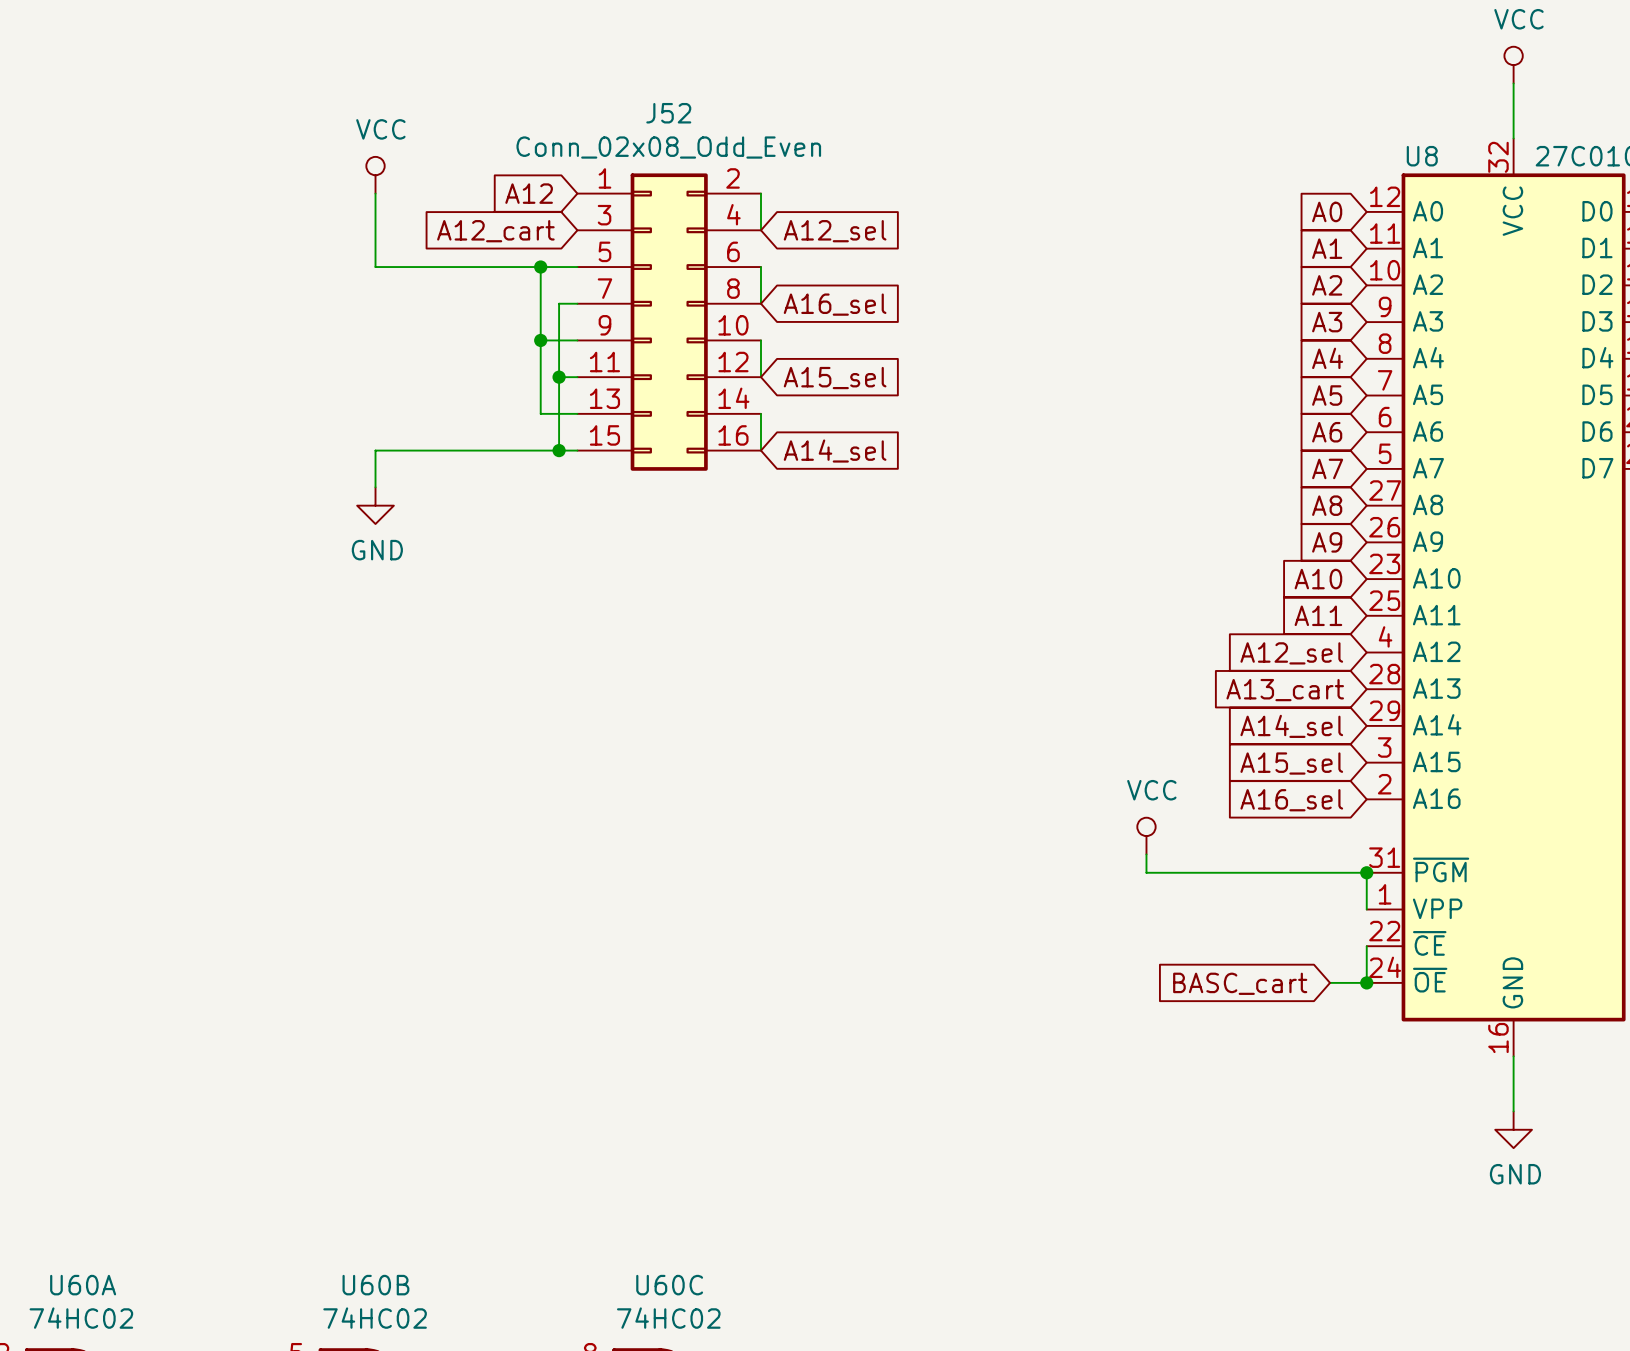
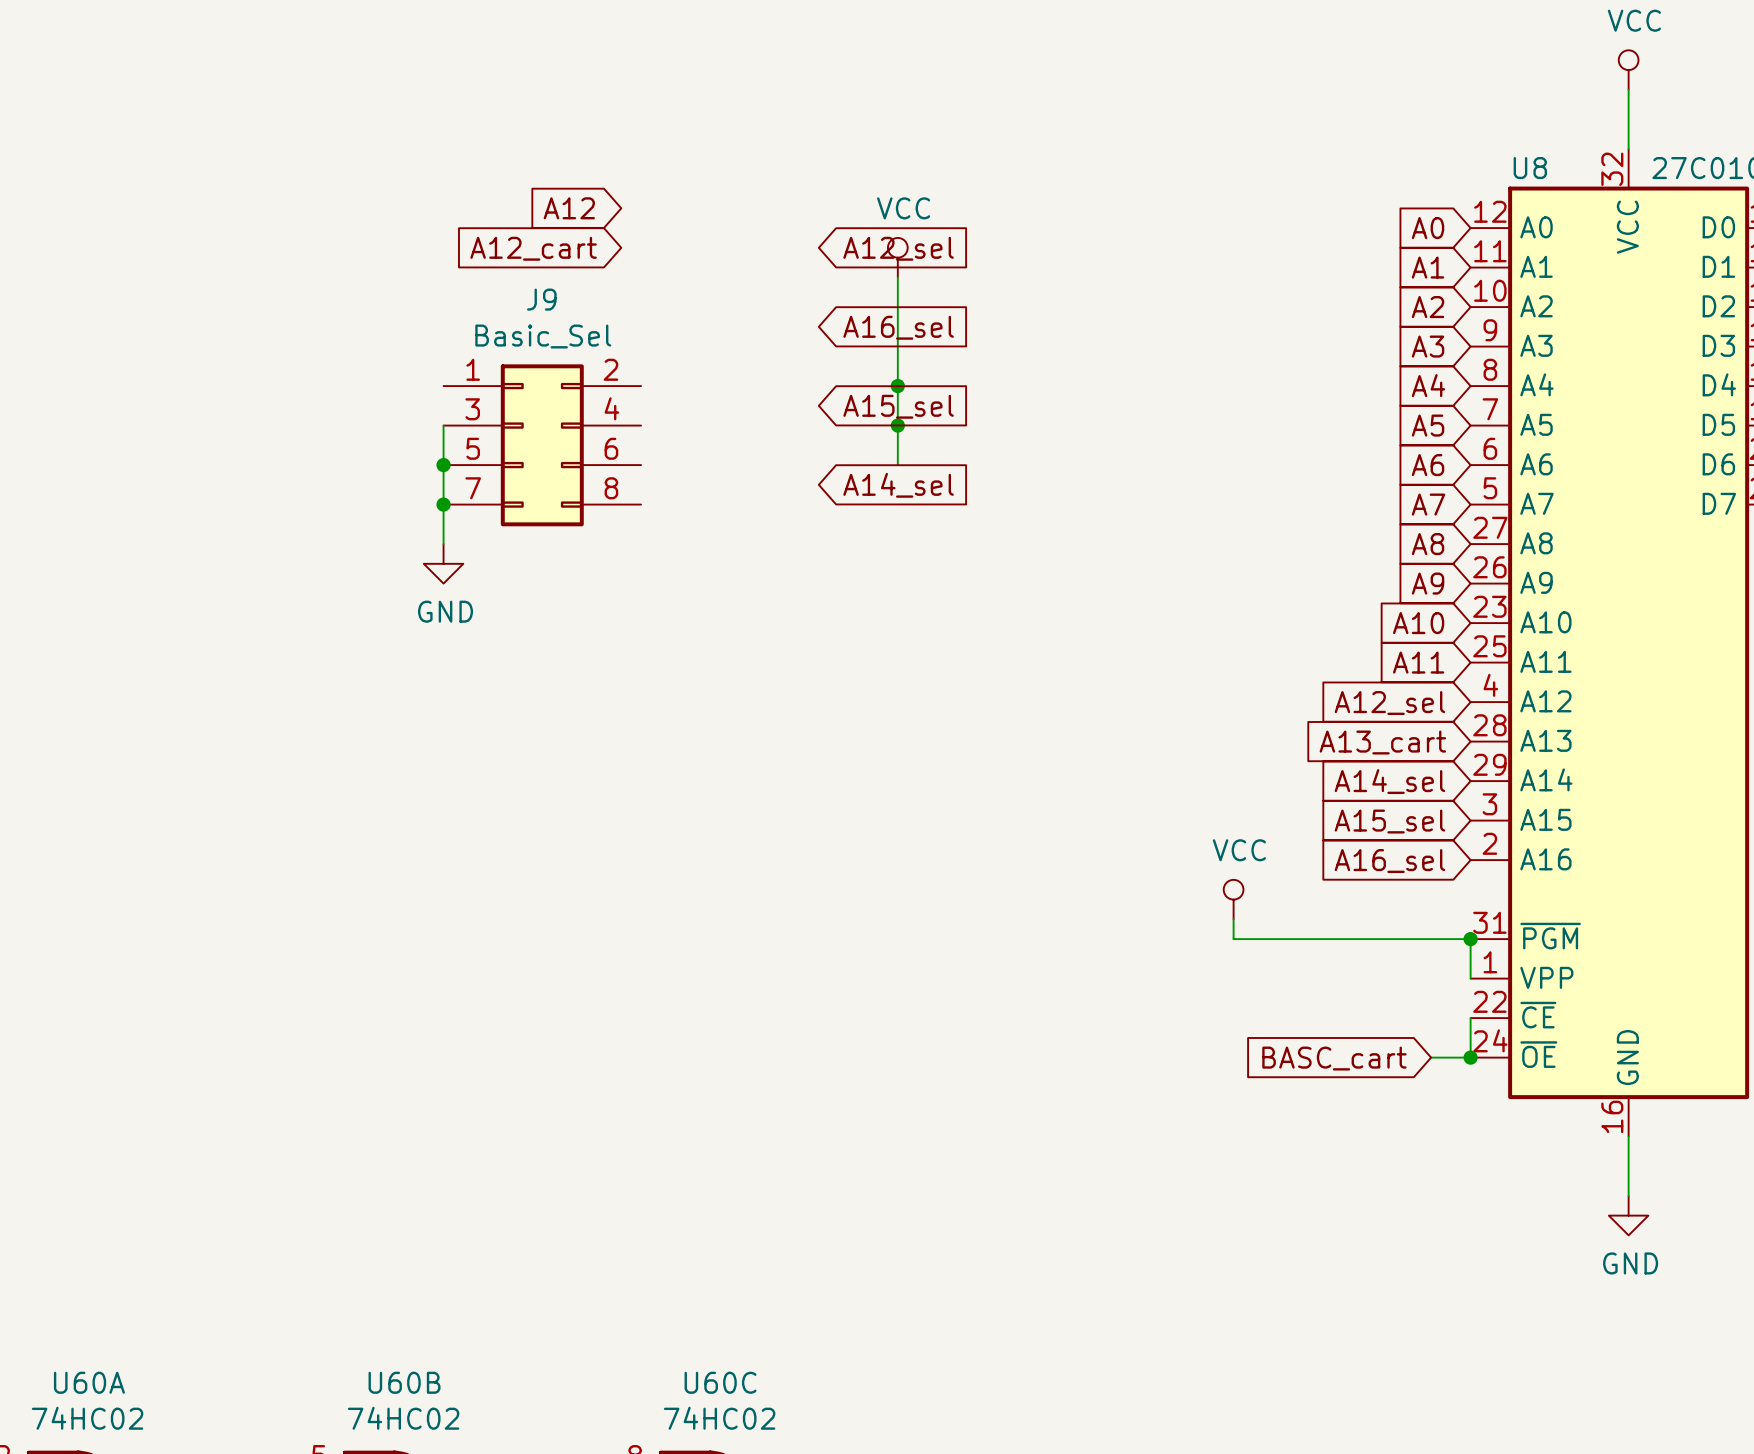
power symbol: VCC (375, 175) -> none
wire: (375, 193) (375, 267) (577, 267) -> none
wire: (760, 193) (760, 230) -> none
power symbol: none -> VCC (897, 257)
wire: none -> (897, 277) (897, 465)
wire: (540, 267) (540, 413) (577, 413) -> none
junction: (540, 267) -> none
wire: (760, 267) (760, 303) -> none
wire: (577, 303) (559, 303) (559, 450) -> none
J52: Conn_02x08_Odd_Even (669, 322) -> none
wire: (540, 340) (577, 340) -> none
junction: (540, 340) -> none
wire: (760, 340) (760, 377) -> none
junction: none -> (897, 386)
wire: (559, 377) (577, 377) -> none
junction: (559, 377) -> none
wire: none -> (443, 425) (443, 544)
junction: none -> (897, 425)
J9: none -> Basic_Sel (542, 445)
wire: (760, 413) (760, 450) -> none
junction: none -> (443, 465)
junction: (559, 450) -> none
wire: (577, 450) (375, 450) (375, 487) -> none
junction: none -> (443, 504)
power symbol position: GND (375, 505) -> GND (443, 563)

